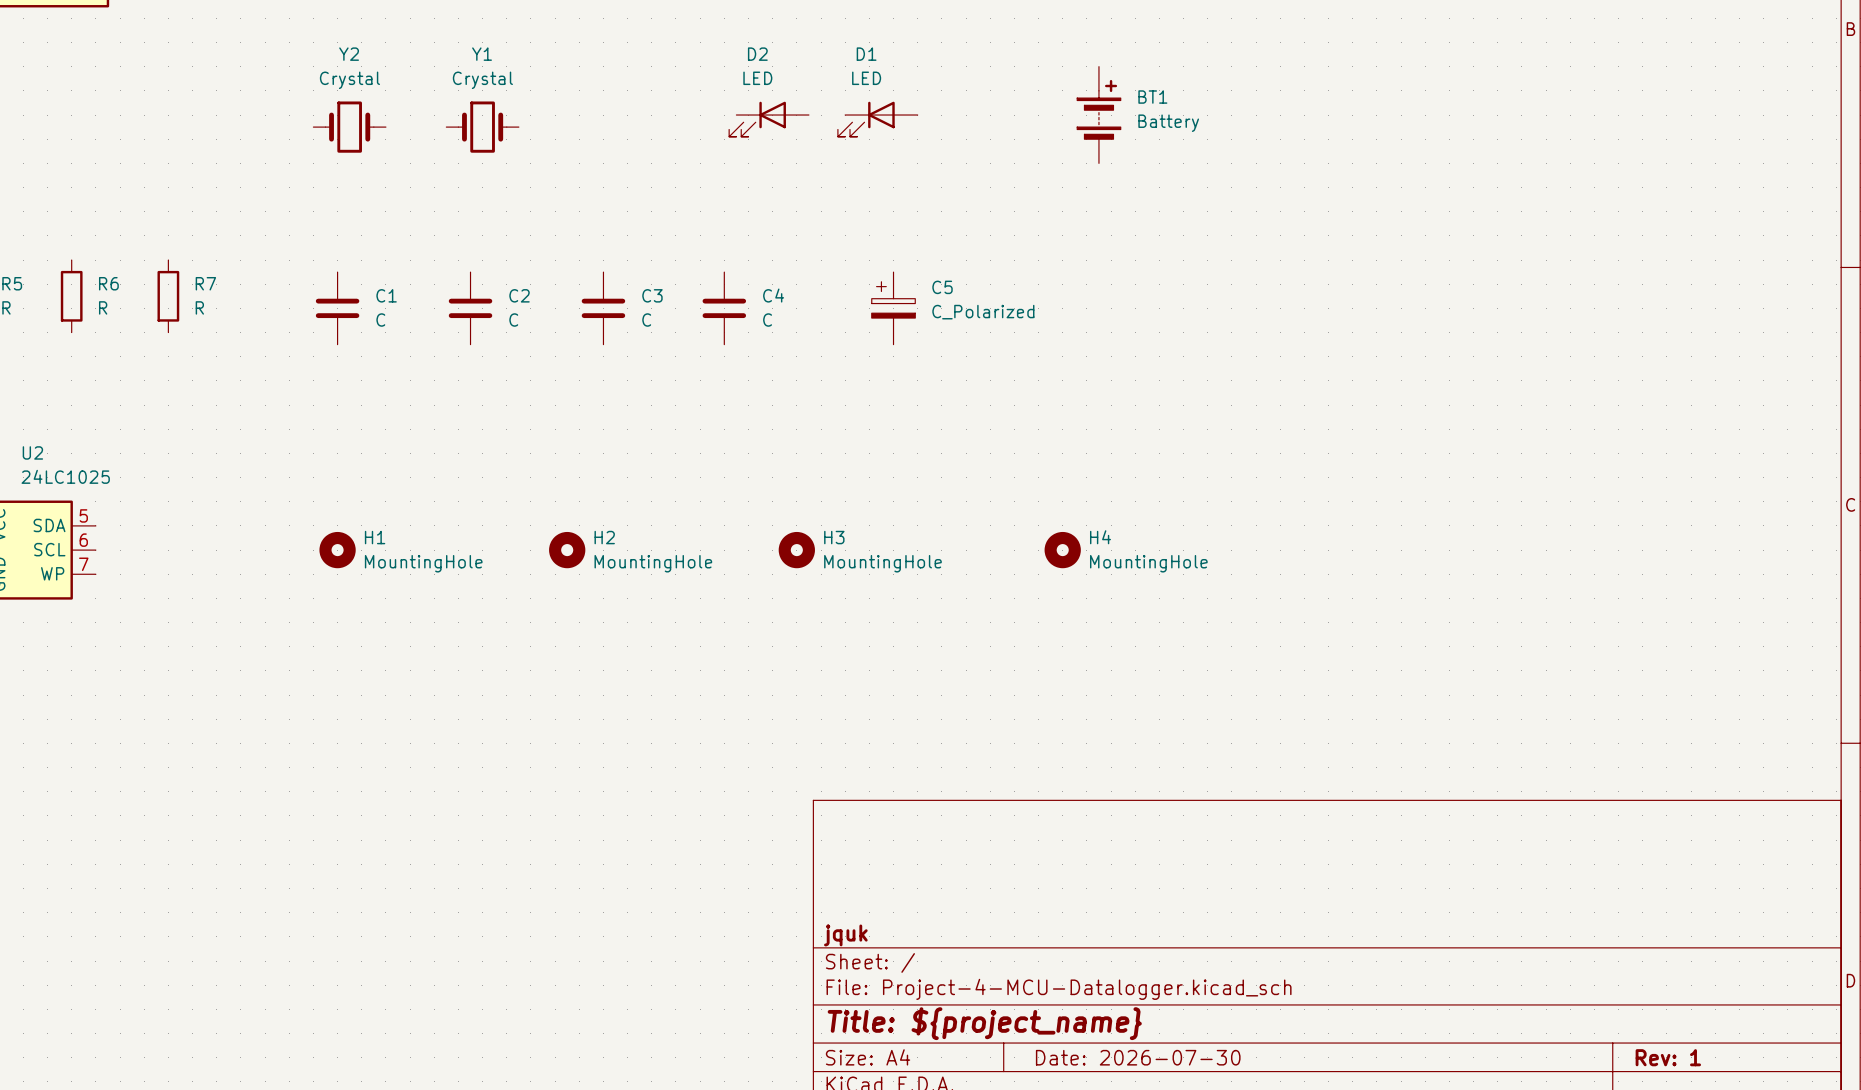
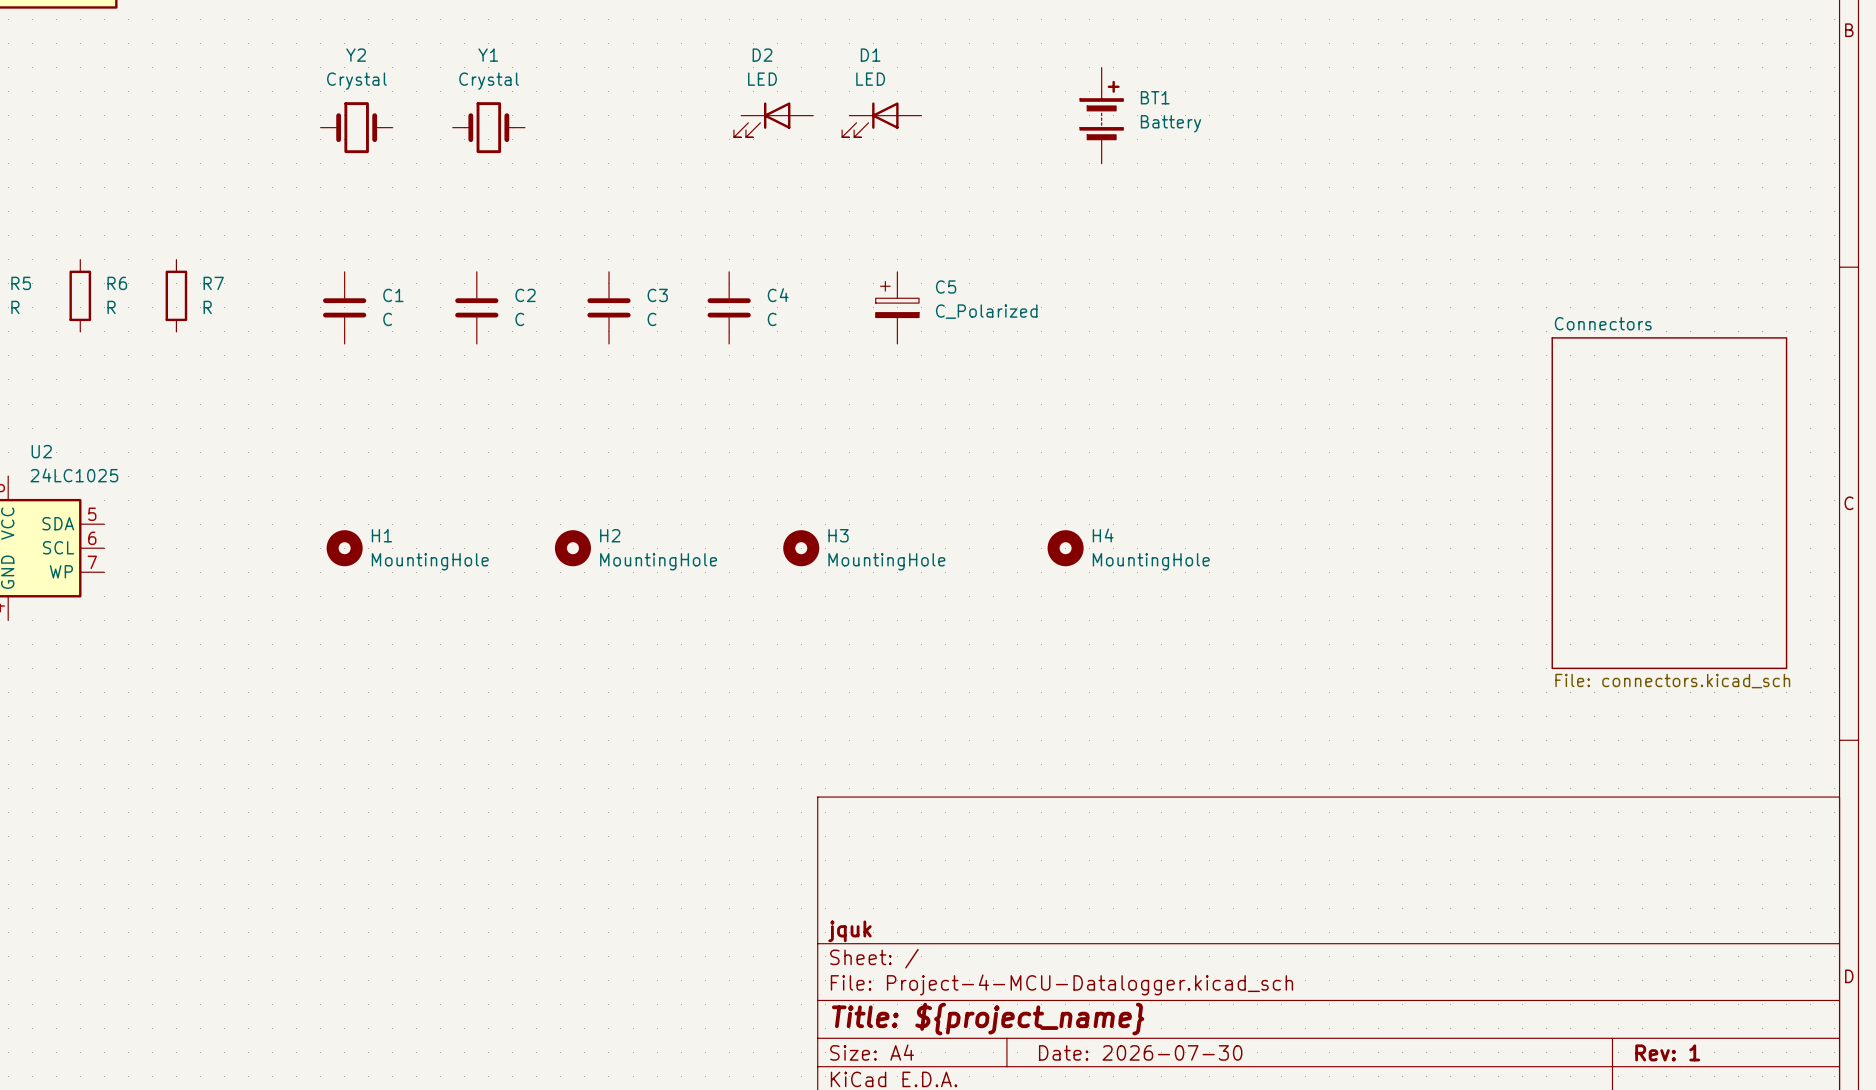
sheet Connectors: none -> File: connectors.kicad_sch (1669, 503)

